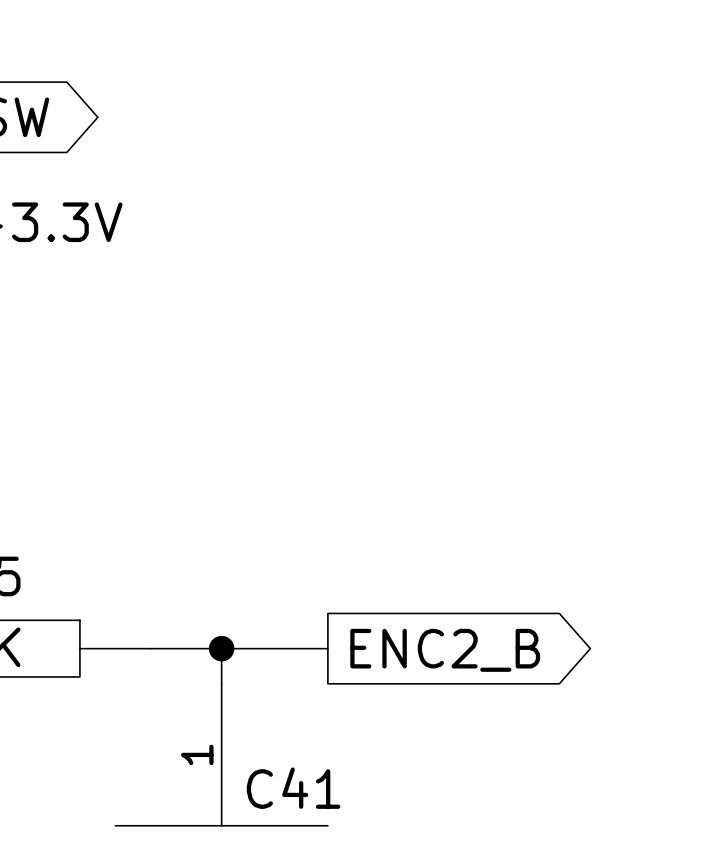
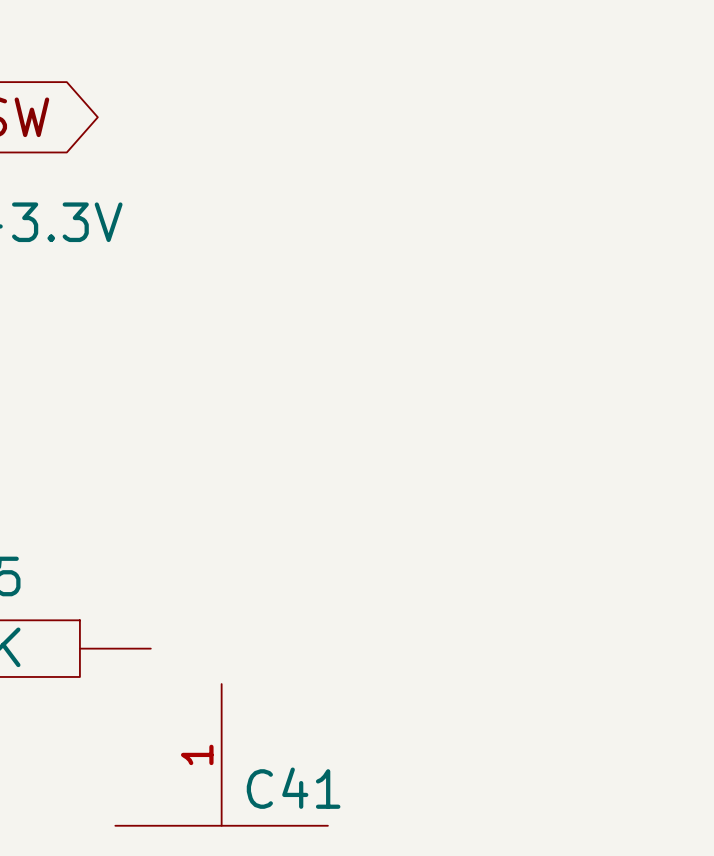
wire: (150, 648) (327, 648) -> none
wire: (221, 648) (221, 684) -> none
junction: (221, 648) -> none
global label: ENC2_B (445, 650) -> none

